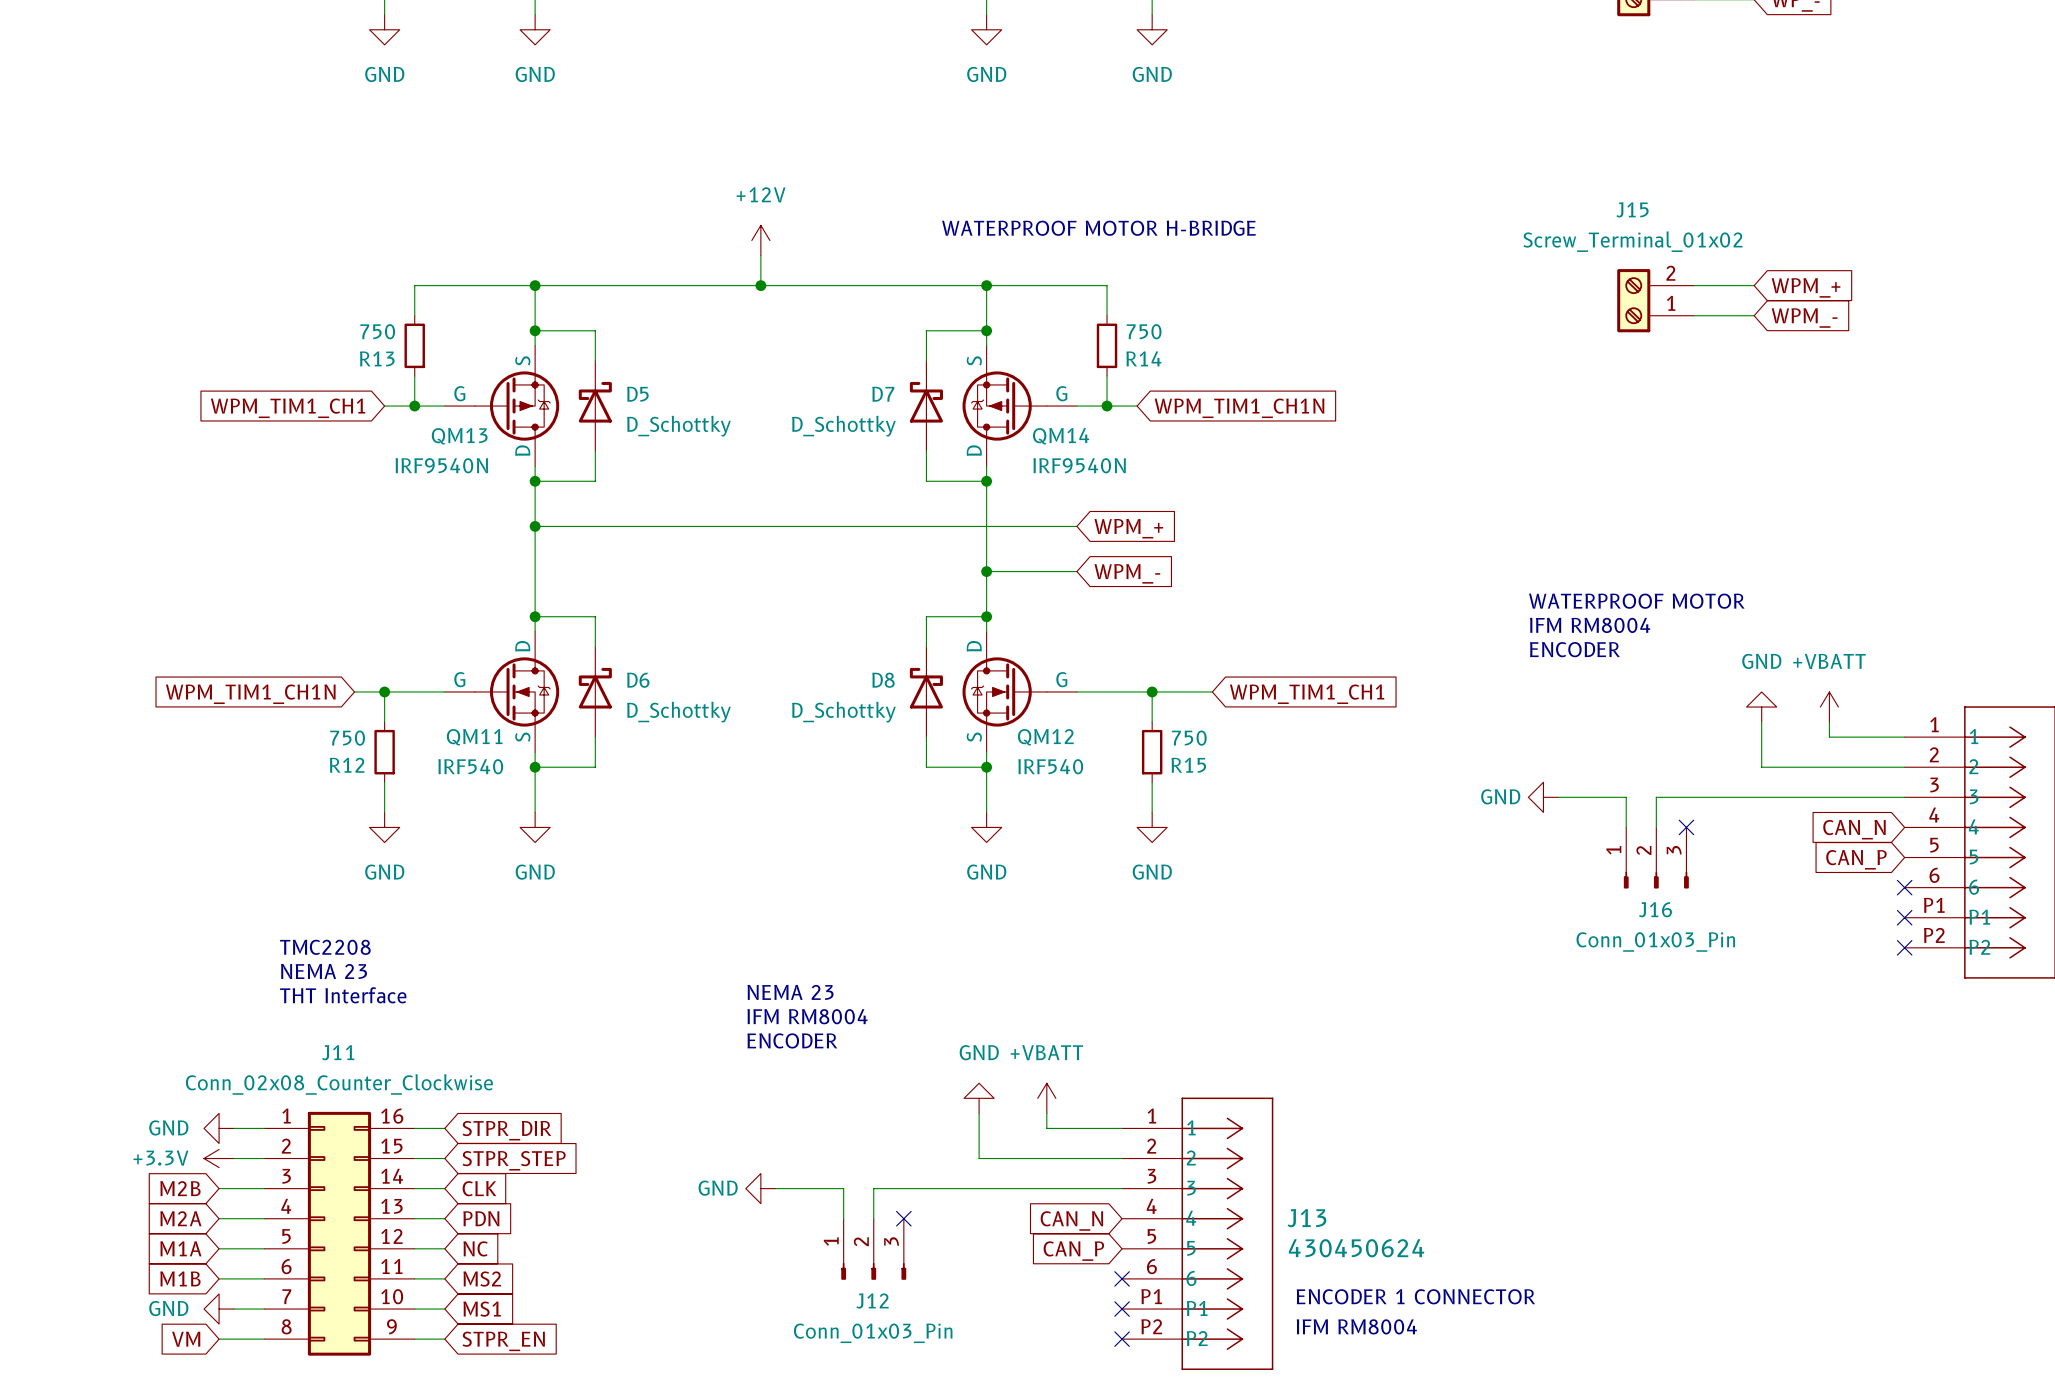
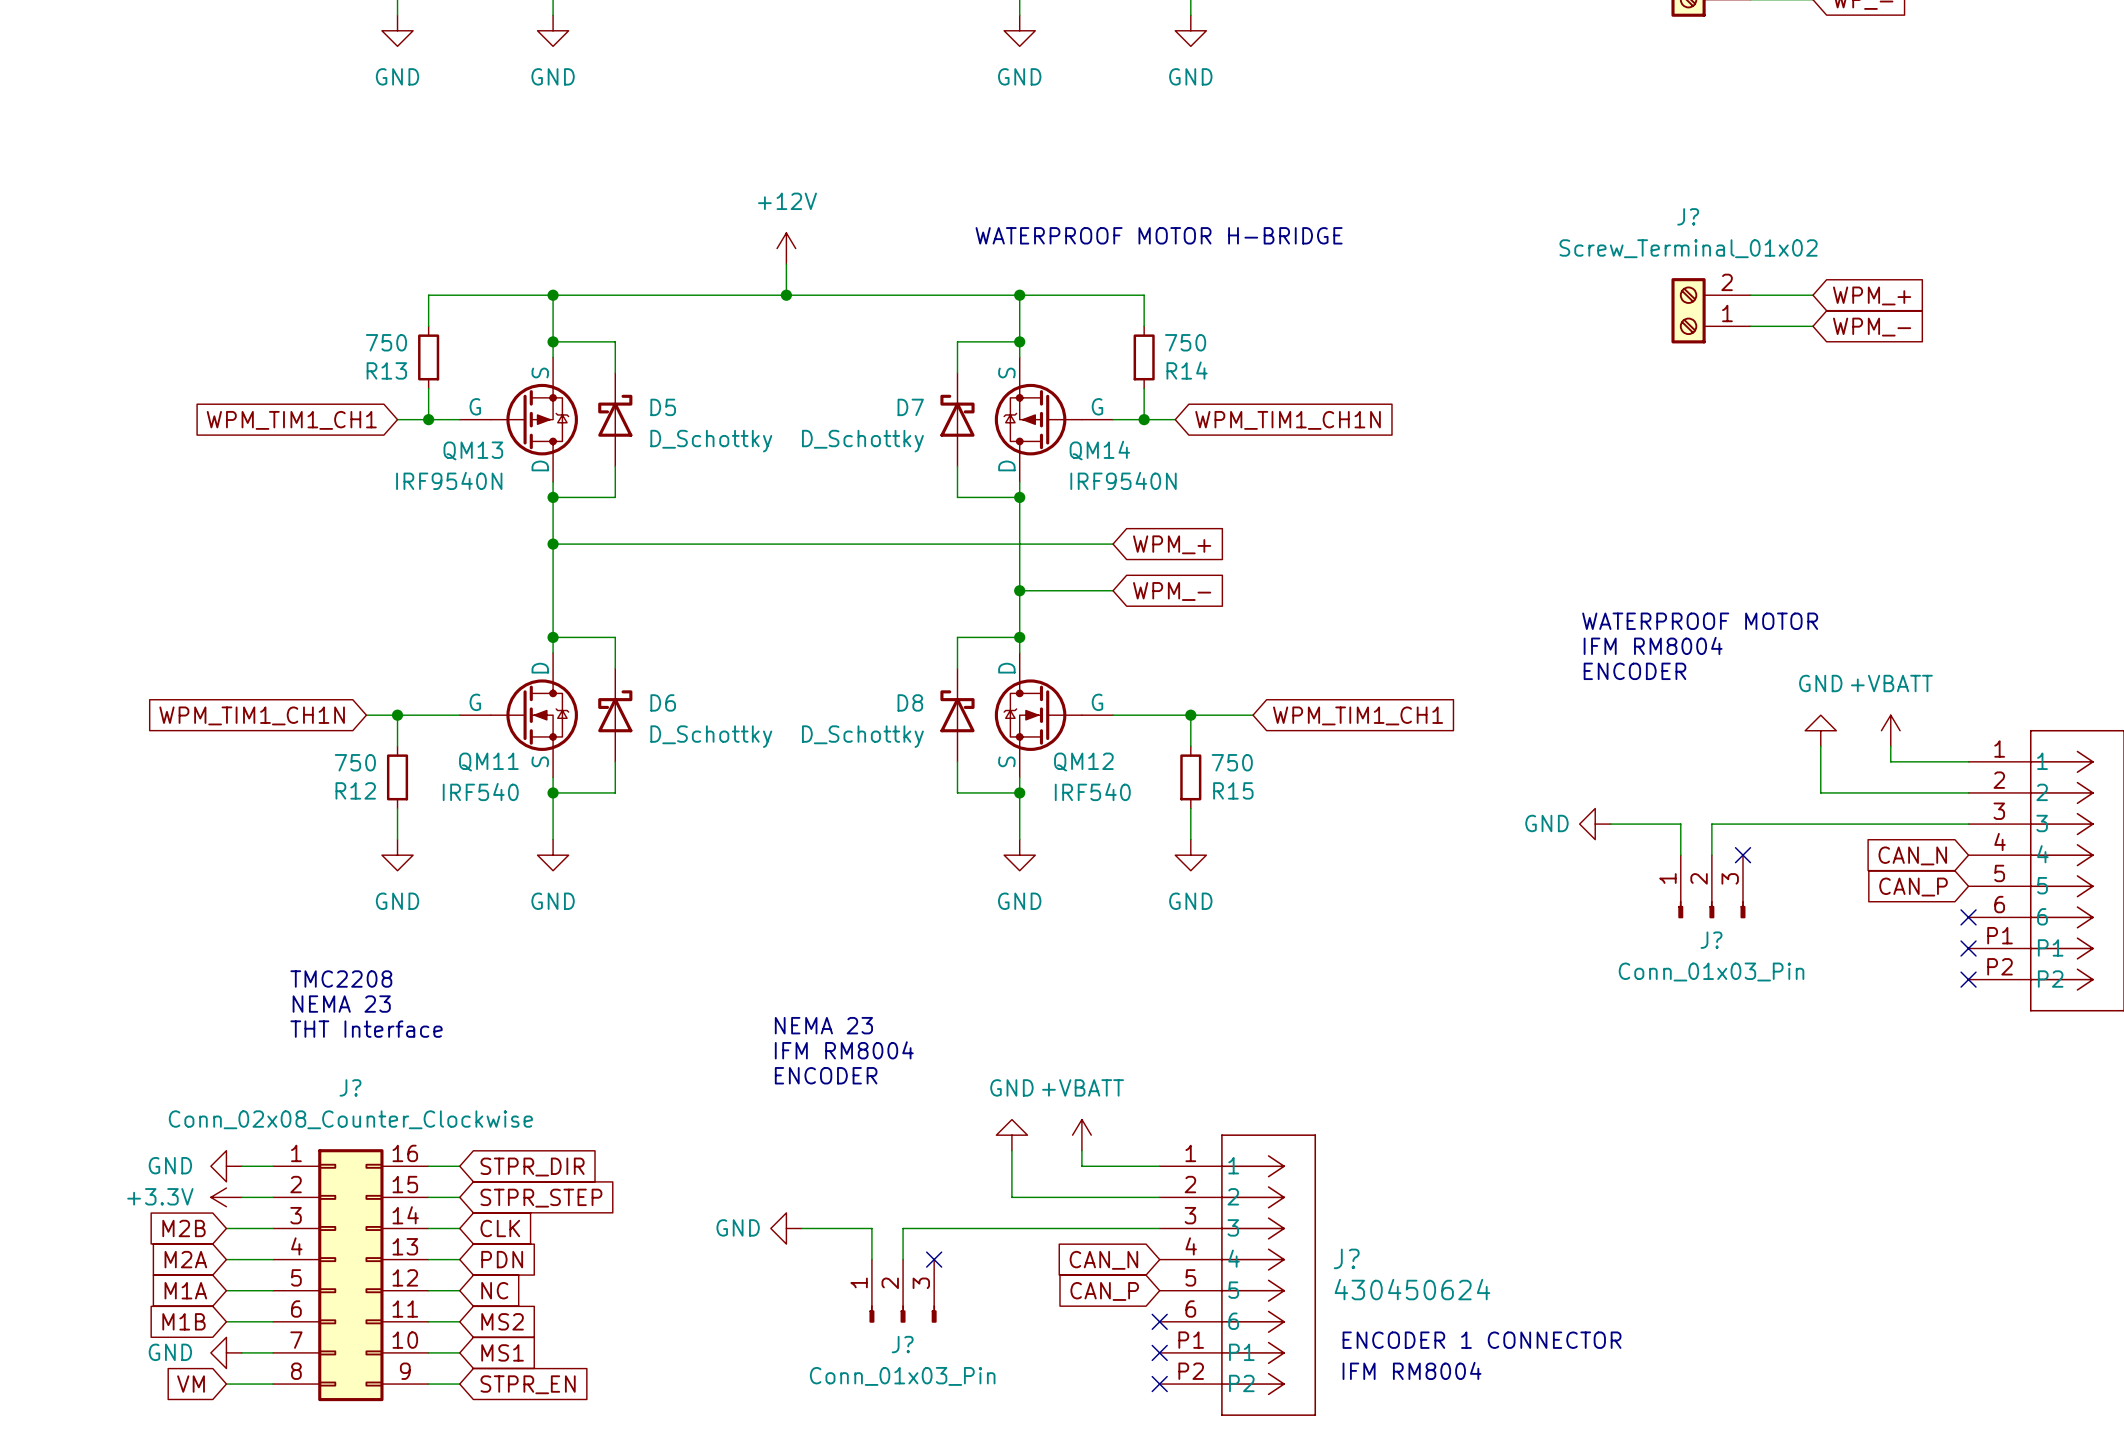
J15 name: J15 (1632, 209) -> J? (1688, 216)
J16 name: J16 (1655, 909) -> J? (1711, 940)
J11 name: J11 (338, 1052) -> J? (350, 1087)
J13 name: J13 (1306, 1218) -> J? (1346, 1258)
J12 name: J12 (872, 1301) -> J? (902, 1344)

